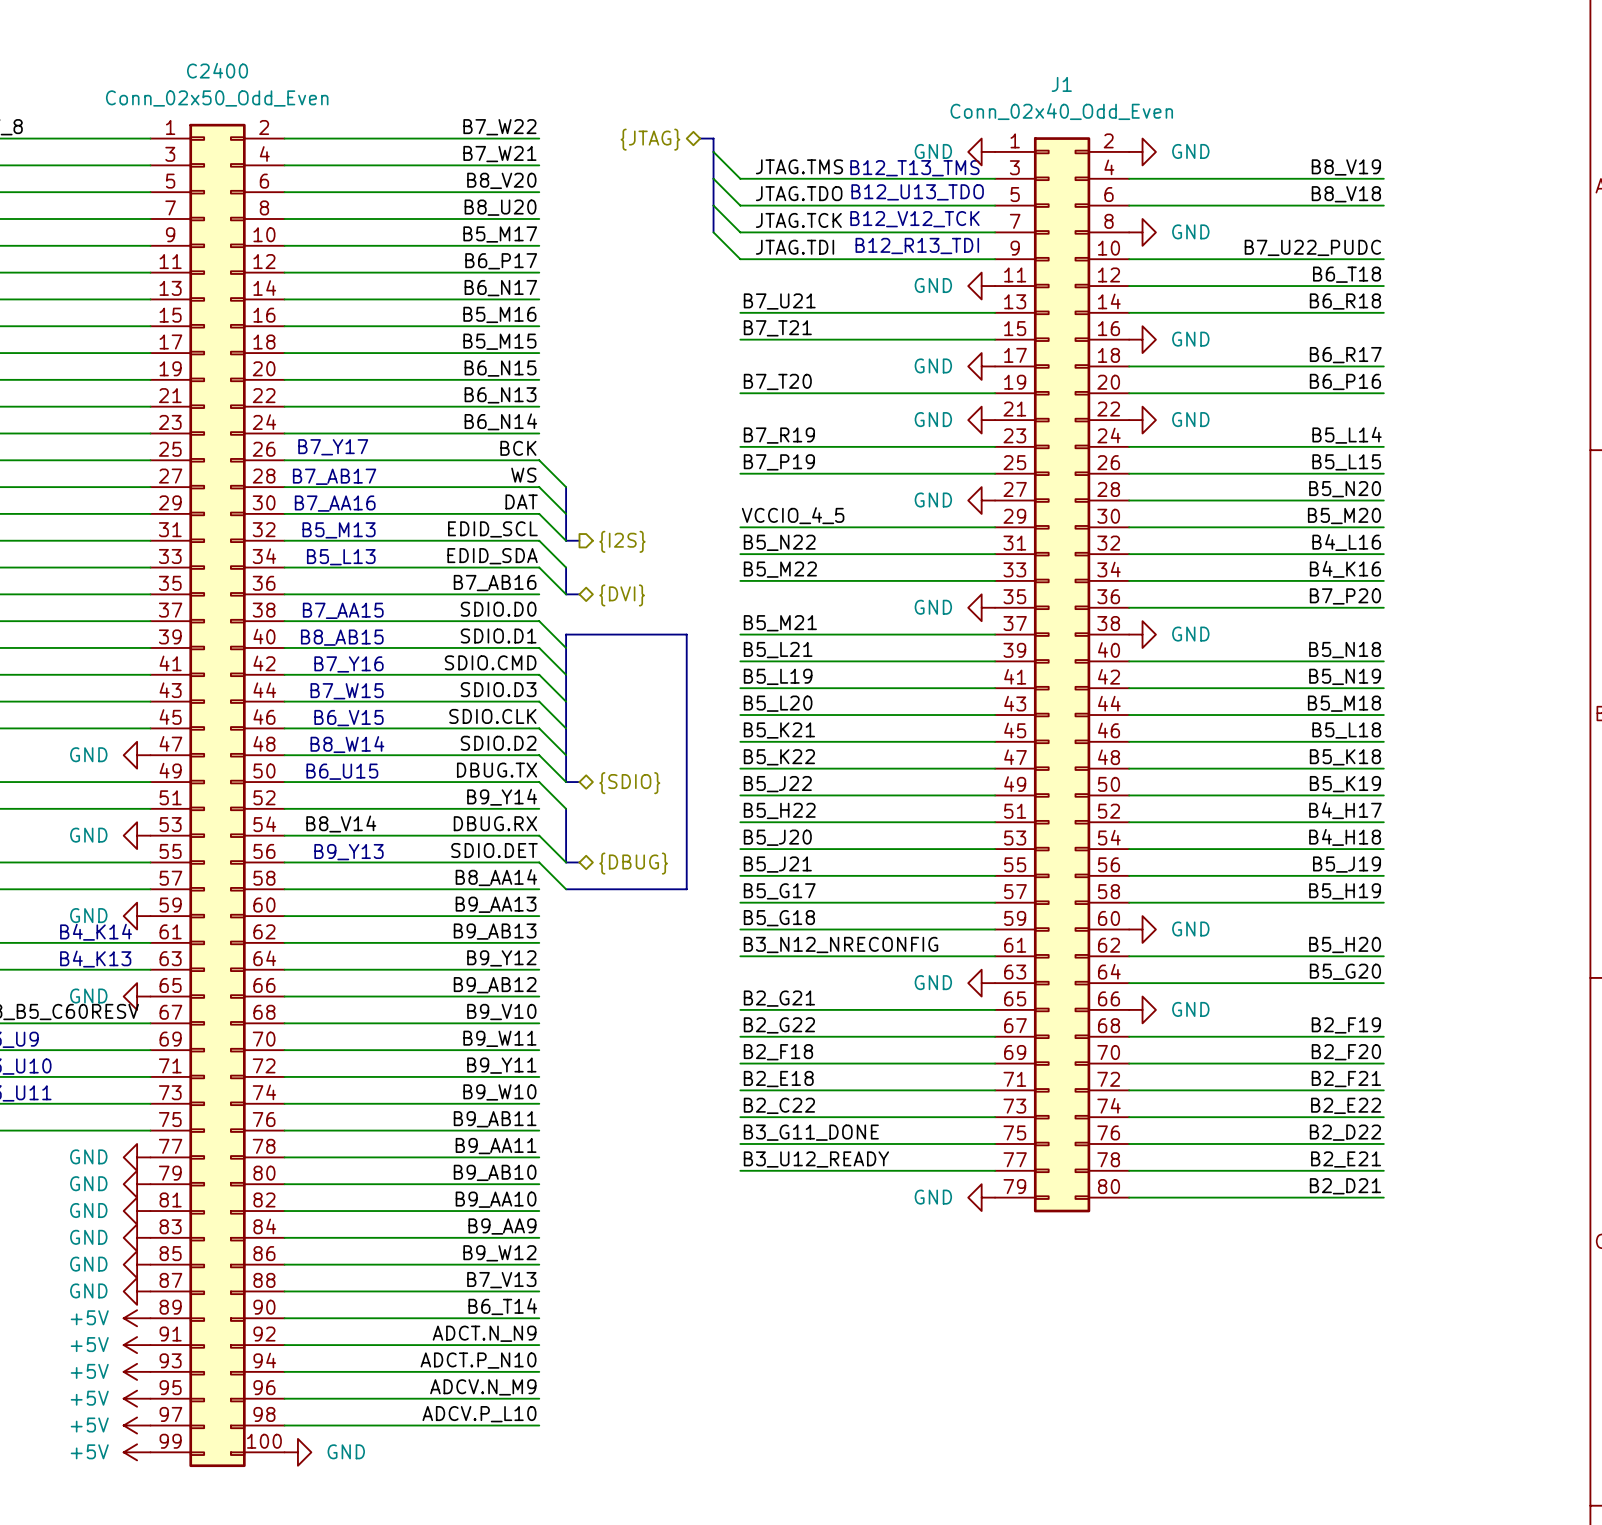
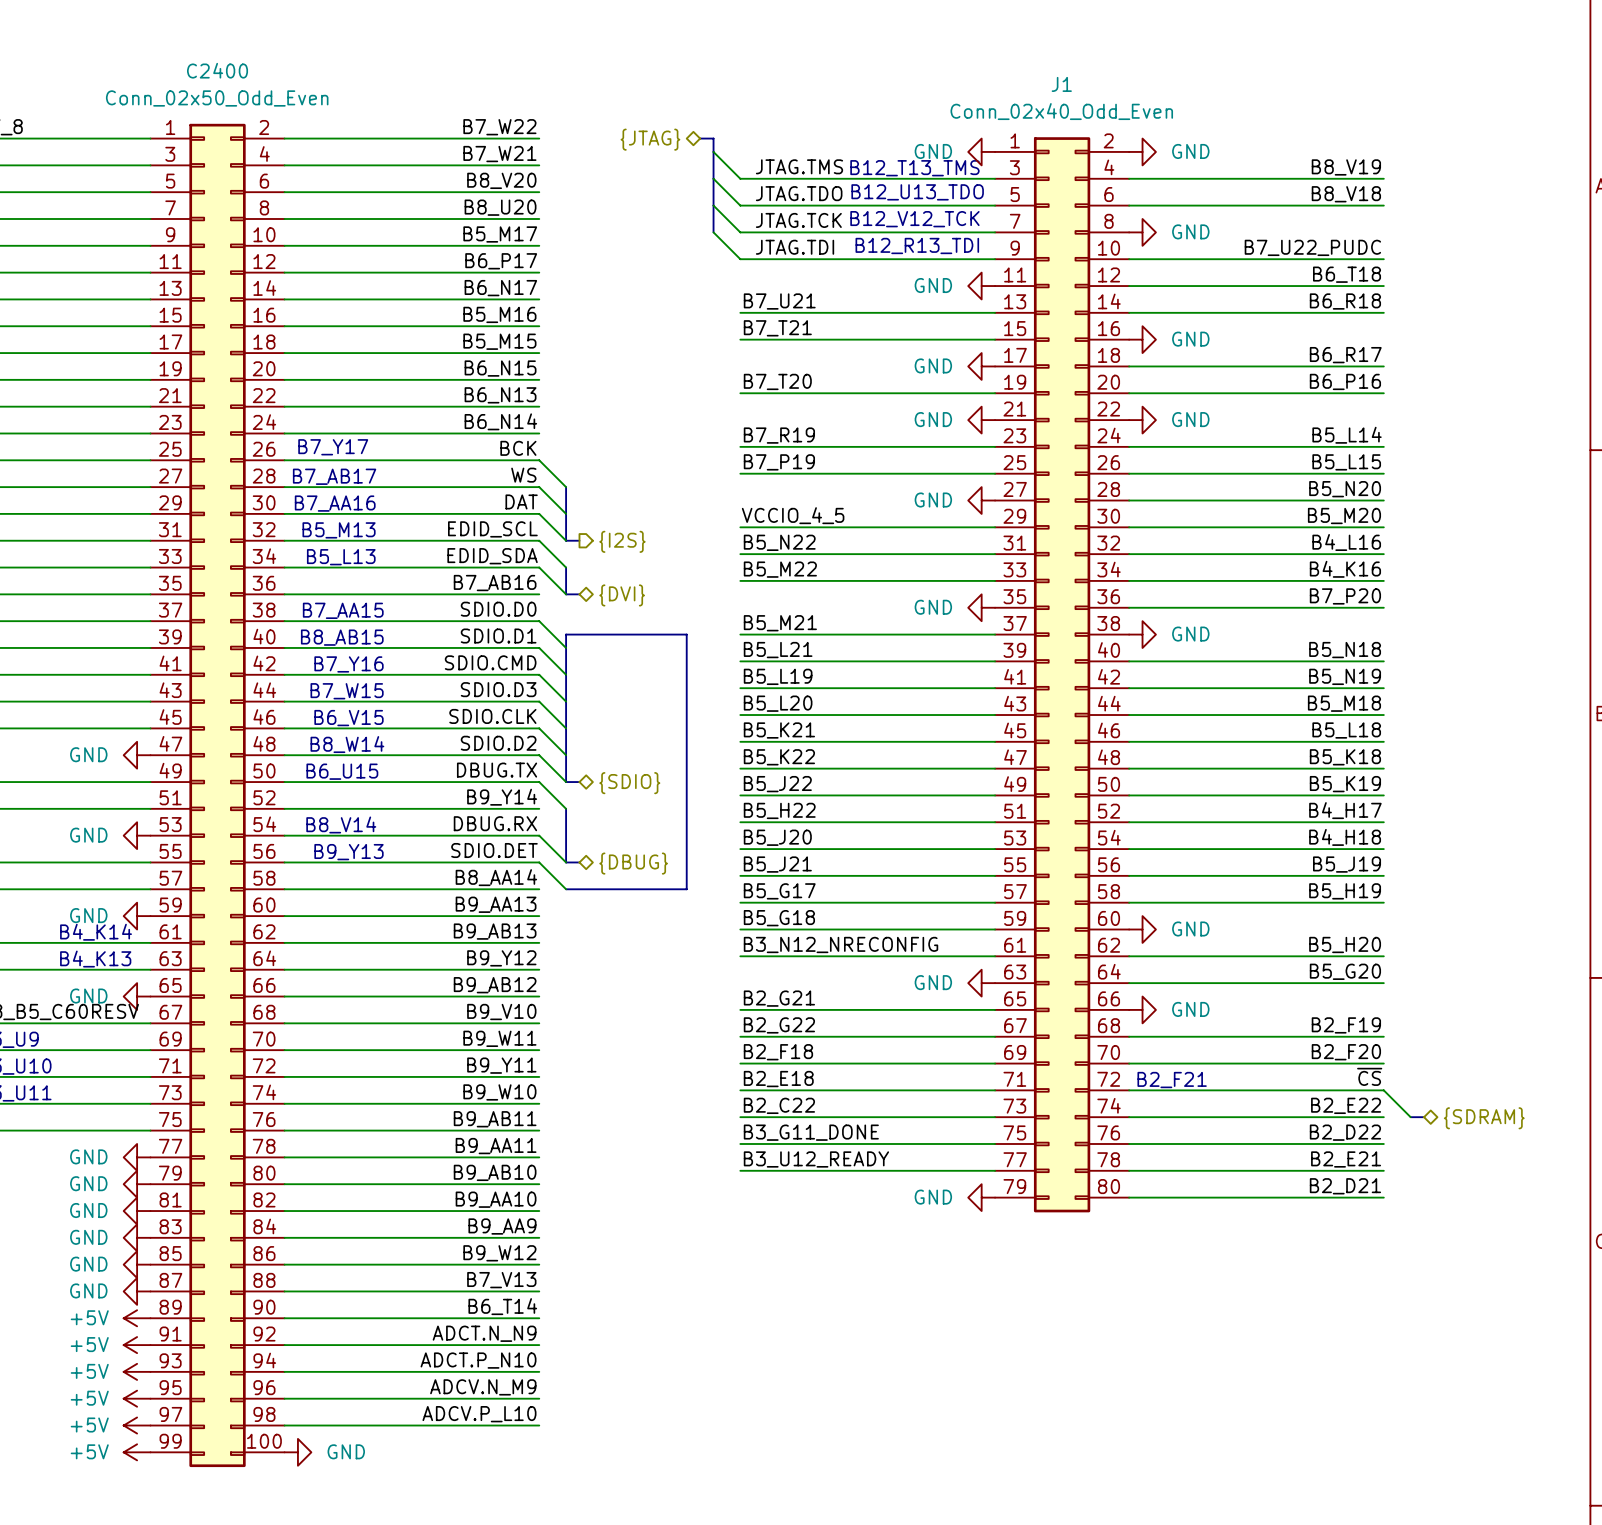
label: B8_V14 (341, 824) -> none
text: none -> B8_V14 (341, 824)
label: B2_F21 (1346, 1079) -> ~{CS} (1369, 1076)
text: none -> B2_F21 (1172, 1080)
wire: none -> (1383, 1090) (1410, 1117)
bus: none -> (1410, 1117) (1424, 1117)
hierarchical label: none -> {SDRAM} (1484, 1118)

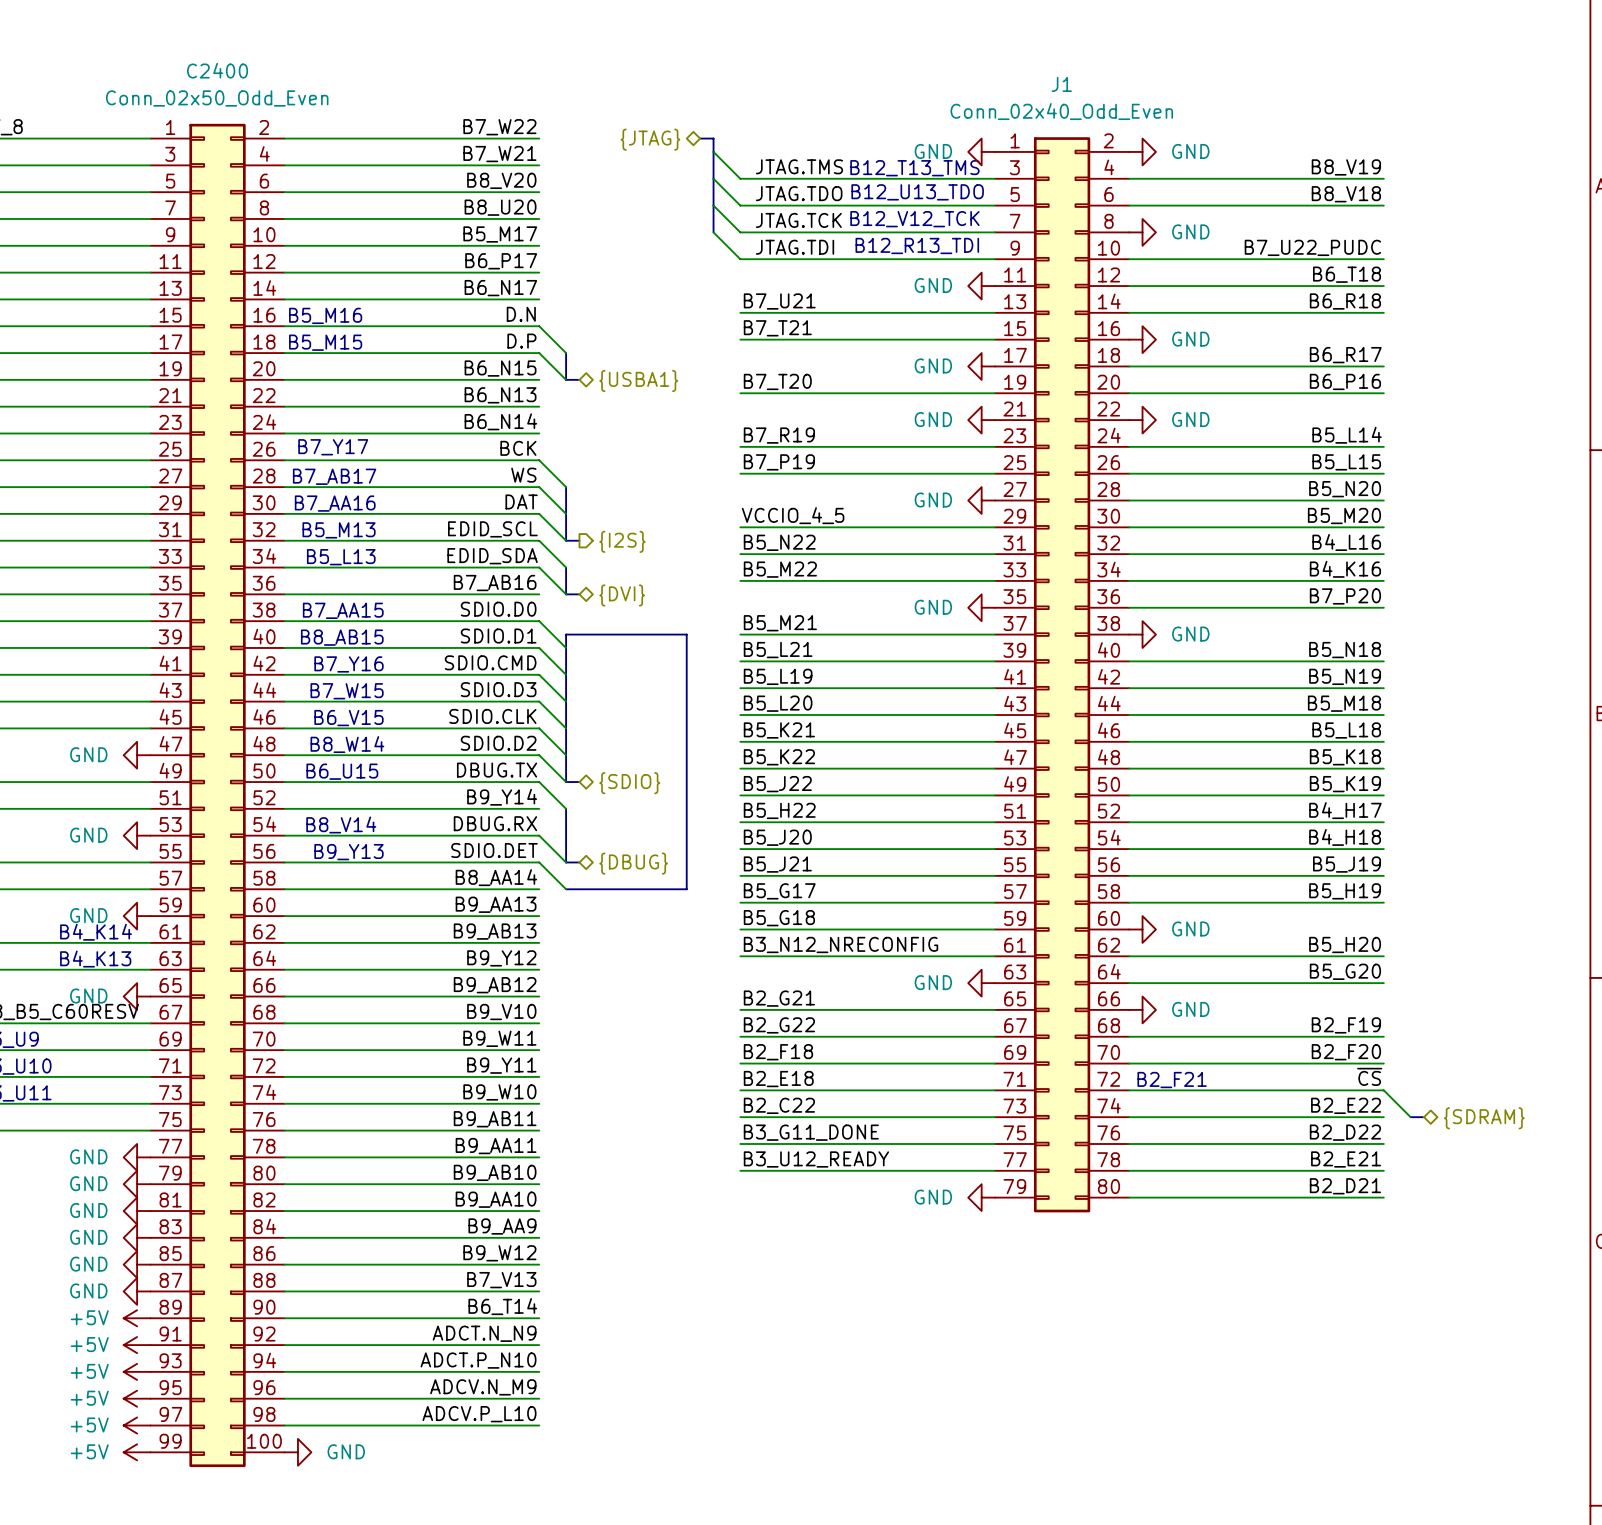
label: B5_M16 (499, 314) -> D.N (521, 314)
text: none -> B5_M16 (325, 315)
wire: none -> (539, 326) (566, 353)
label: B5_M15 (499, 341) -> D.P (521, 341)
text: none -> B5_M15 (325, 342)
wire: none -> (539, 353) (566, 379)
bus: none -> (566, 353) (566, 379) (579, 379)
hierarchical label: none -> {USBA1} (638, 380)

